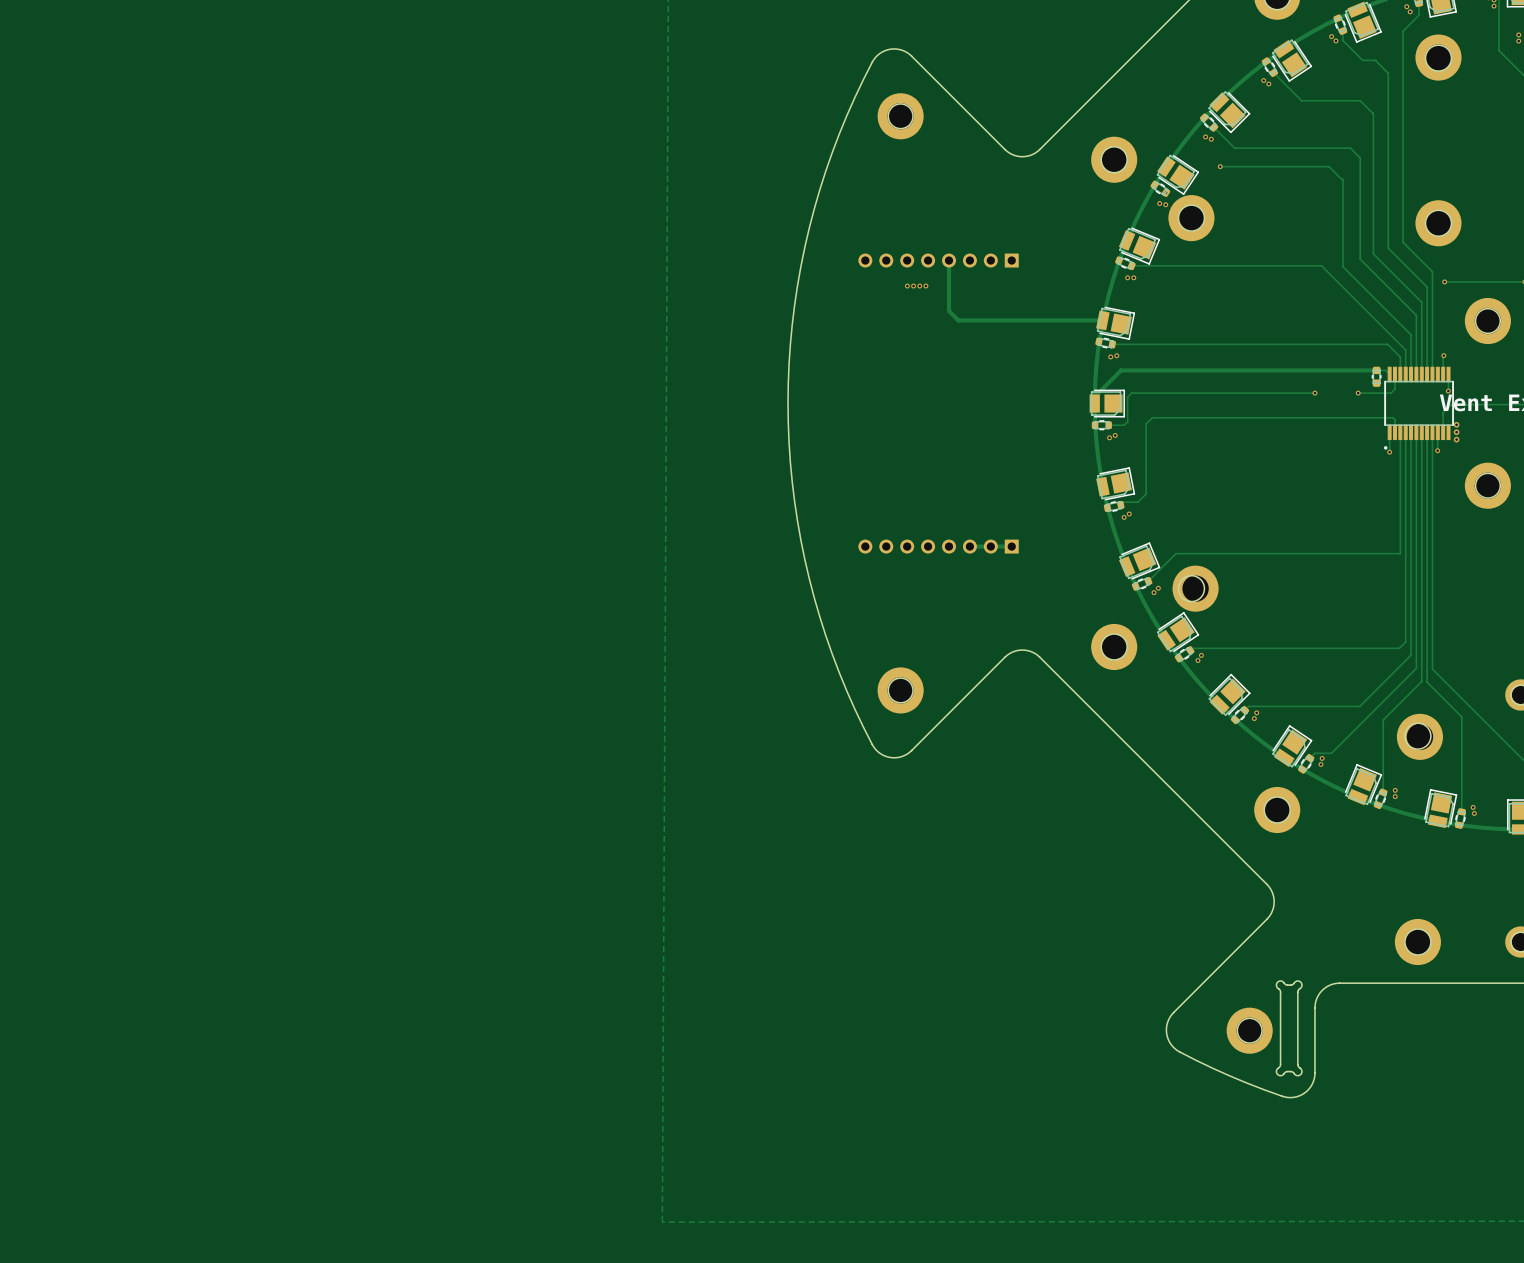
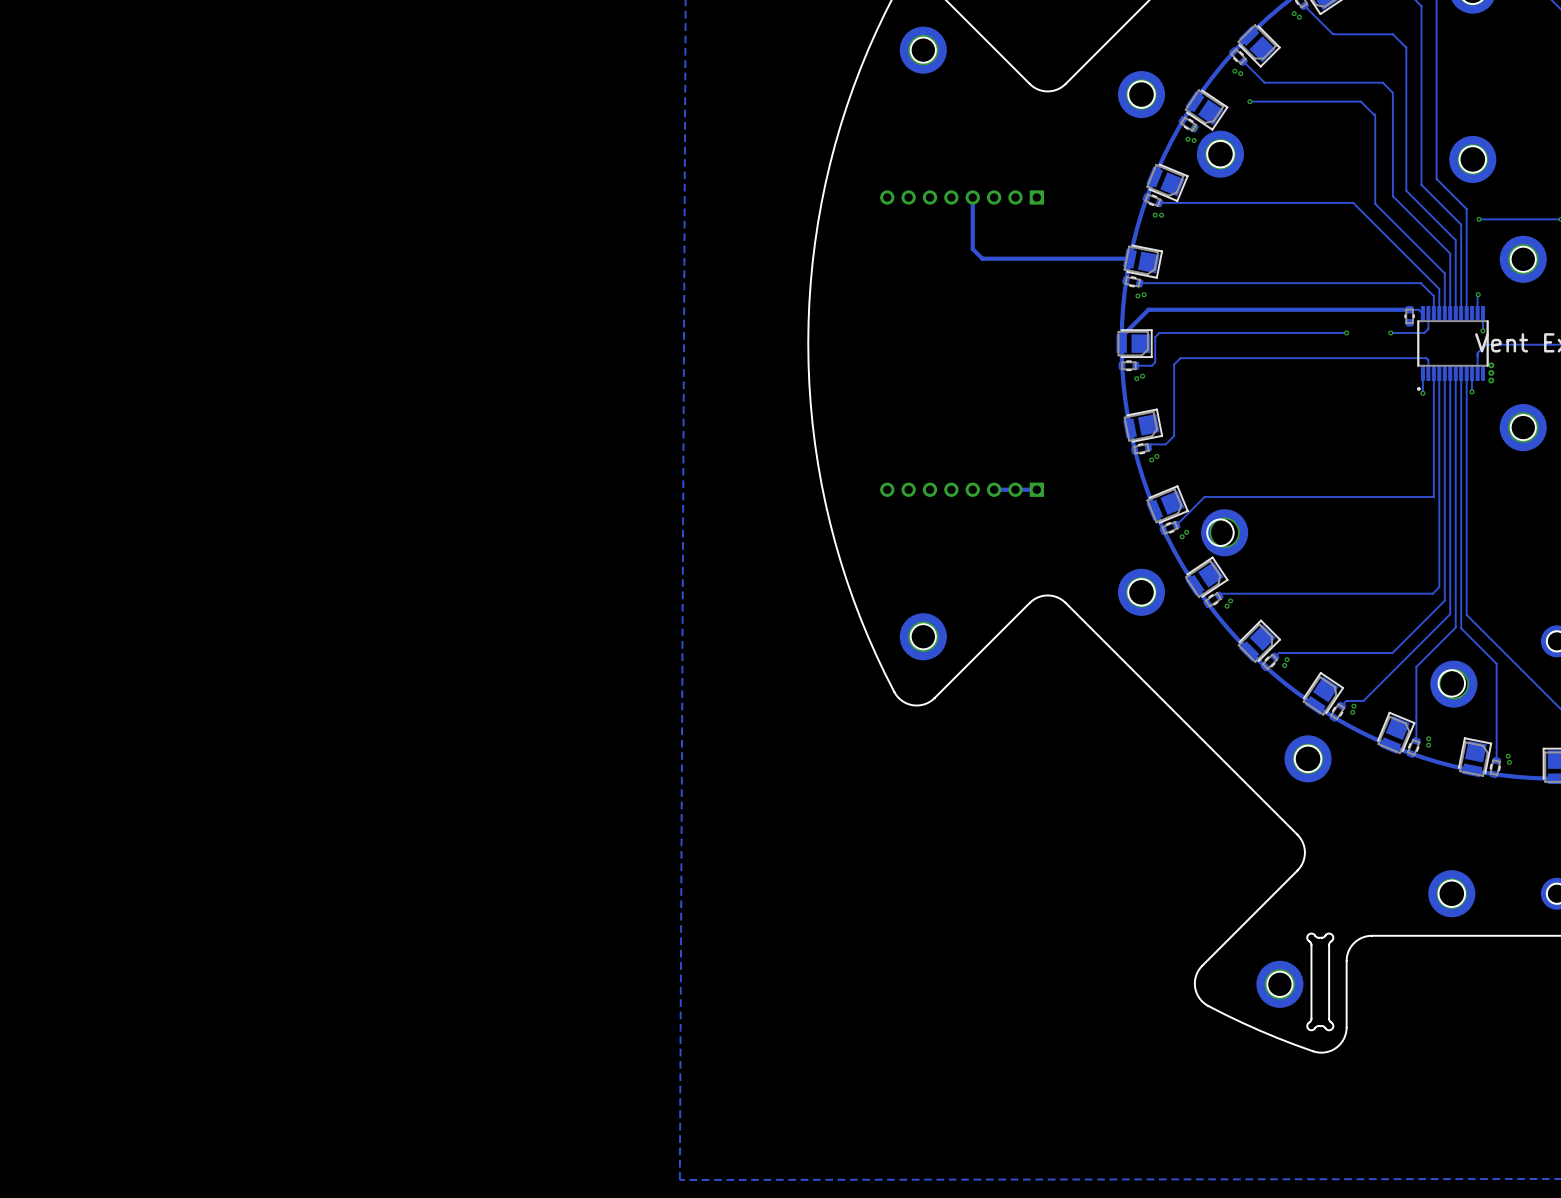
via: (907, 286) -> none
via: (913, 286) -> none
via: (919, 286) -> none
via: (925, 286) -> none

